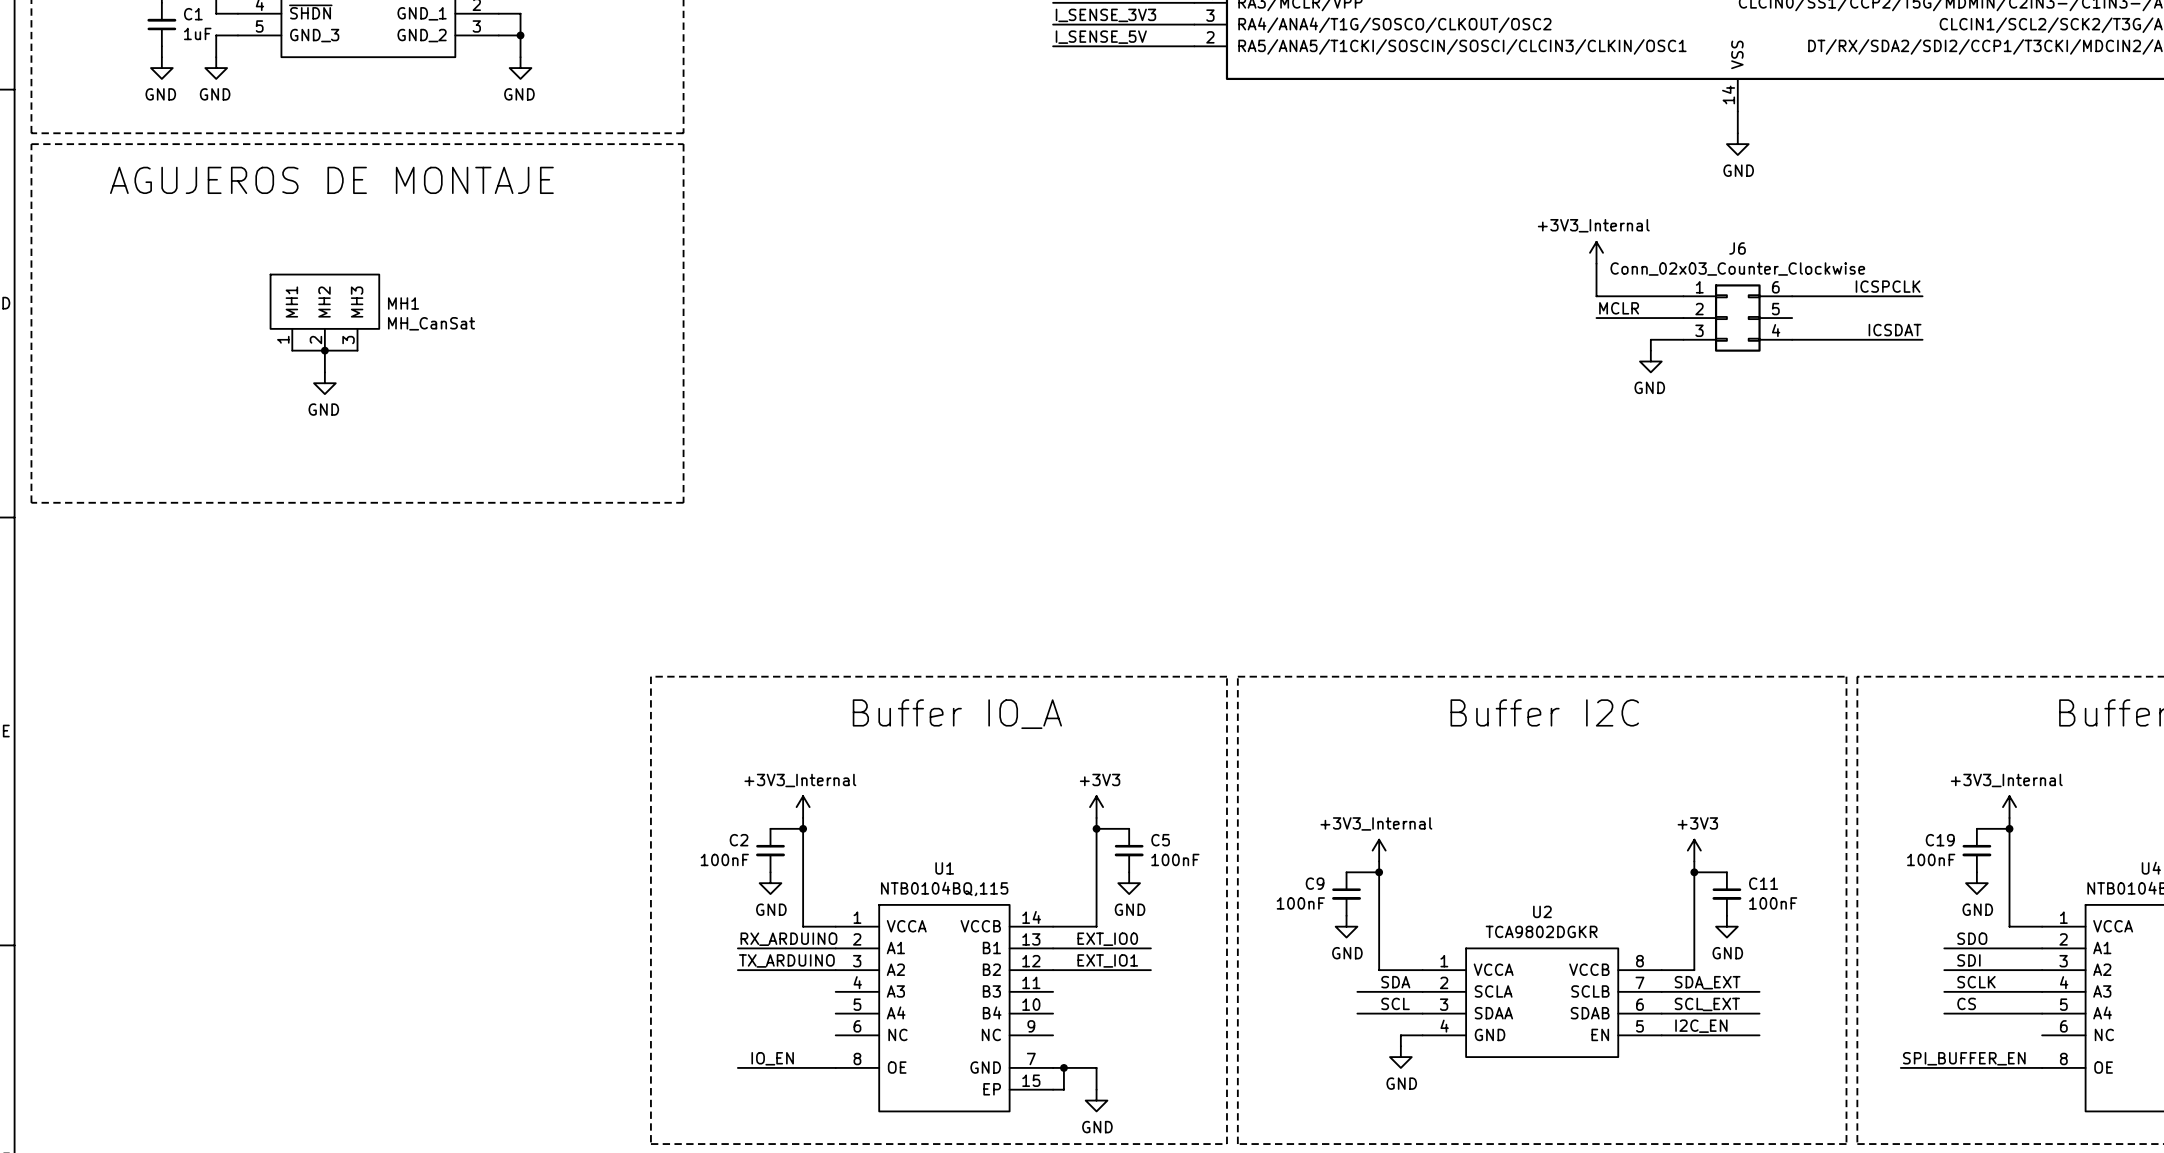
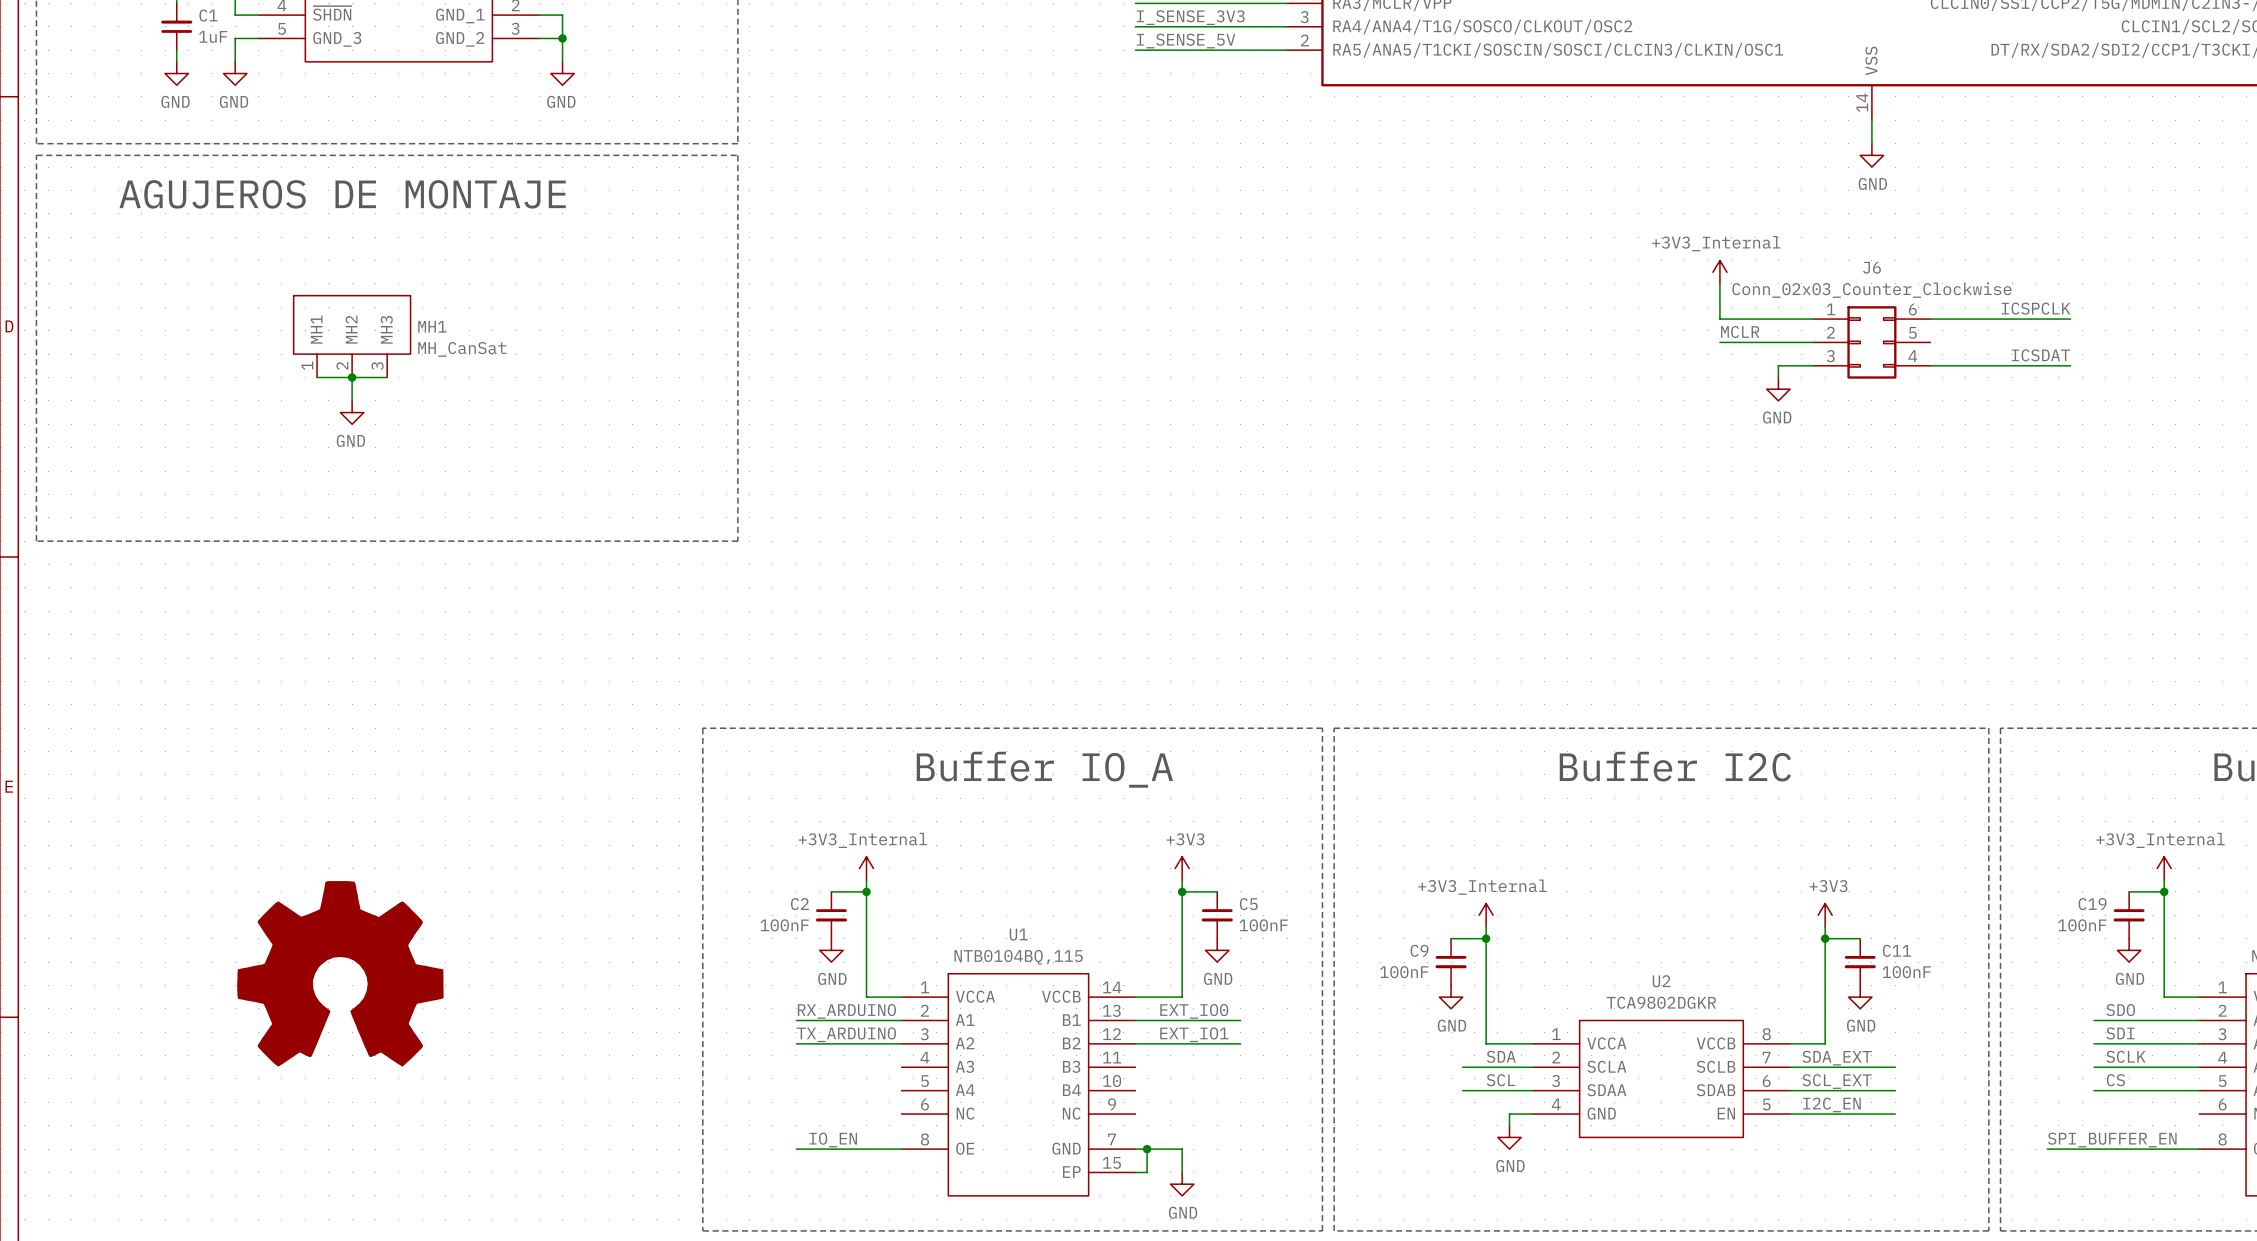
power symbol: none -> (340, 973)

